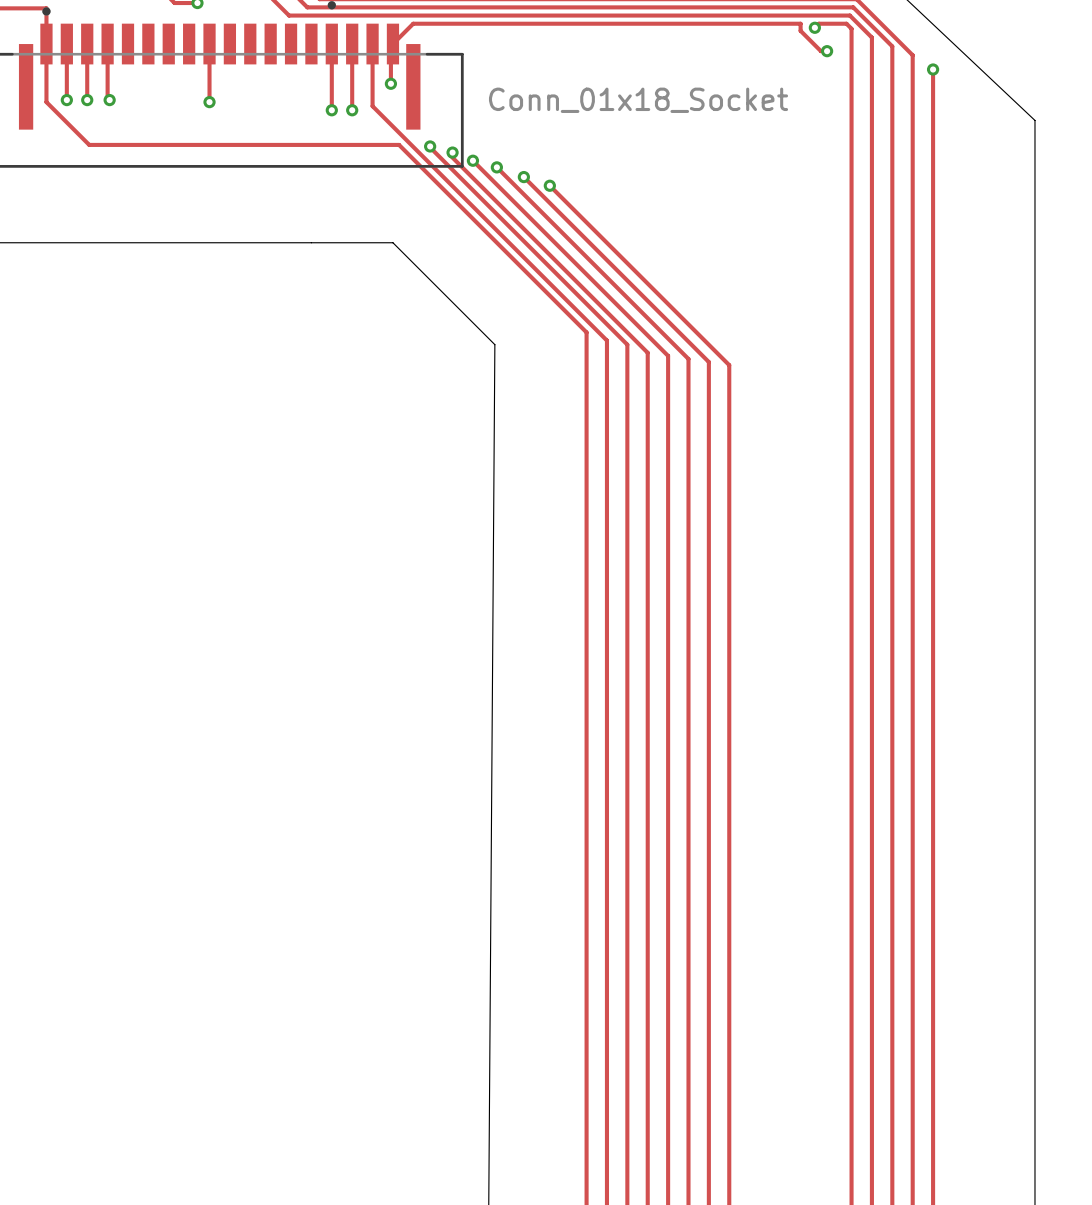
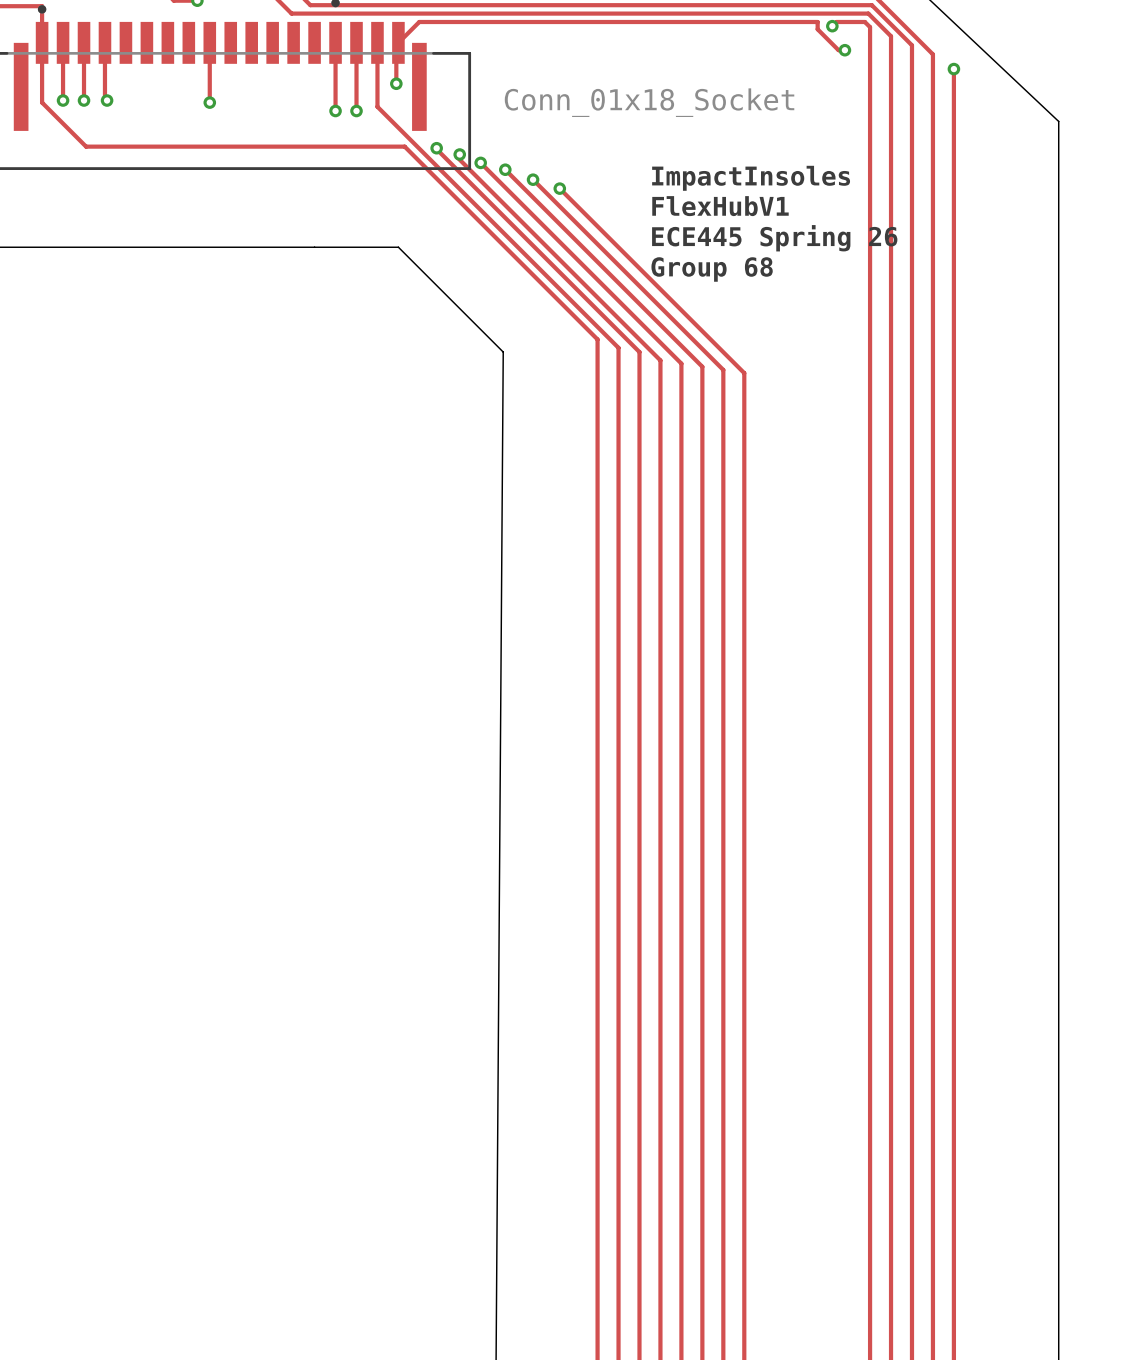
text: none -> ImpactInsoles (751, 178)
text: none -> FlexHubV1 (720, 206)
text: none -> ECE445 Spring 26 (774, 238)
text: none -> Group 68 (712, 269)

